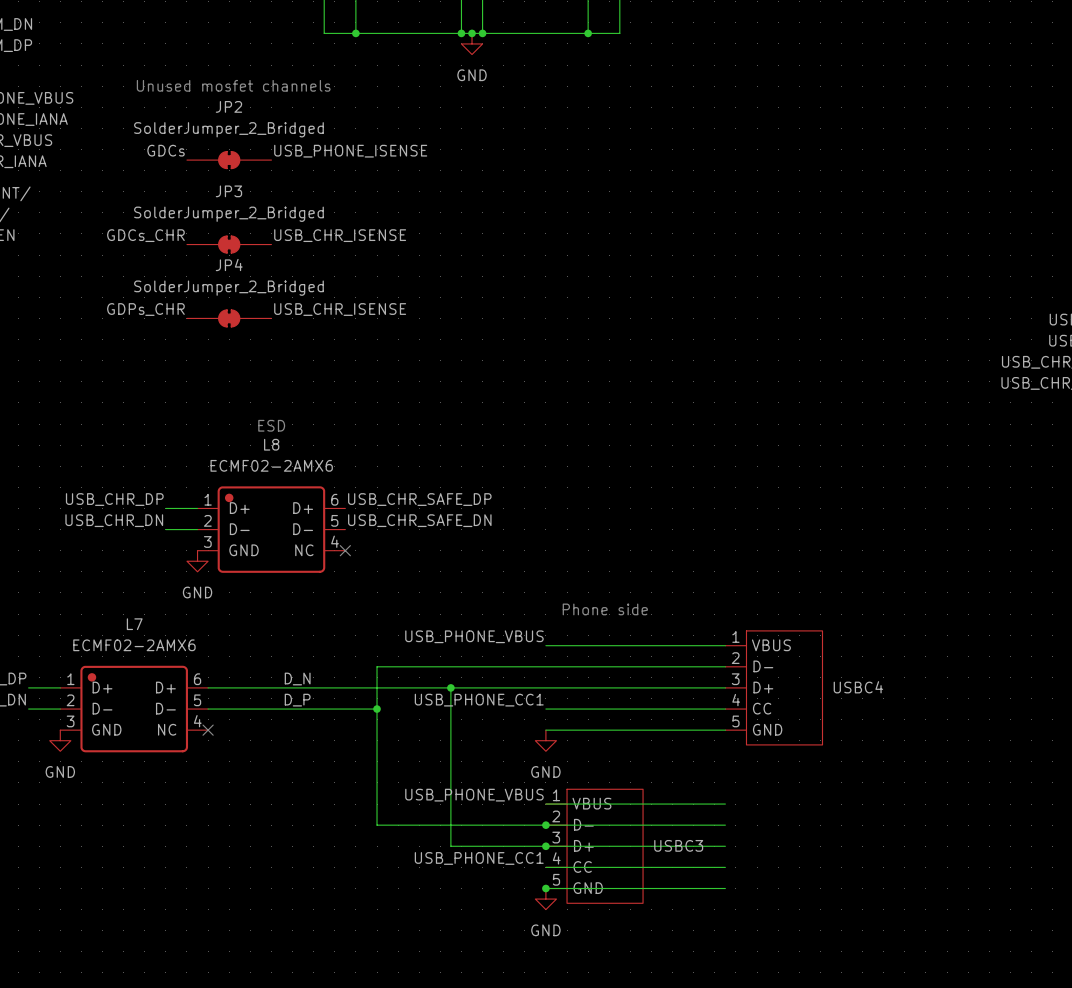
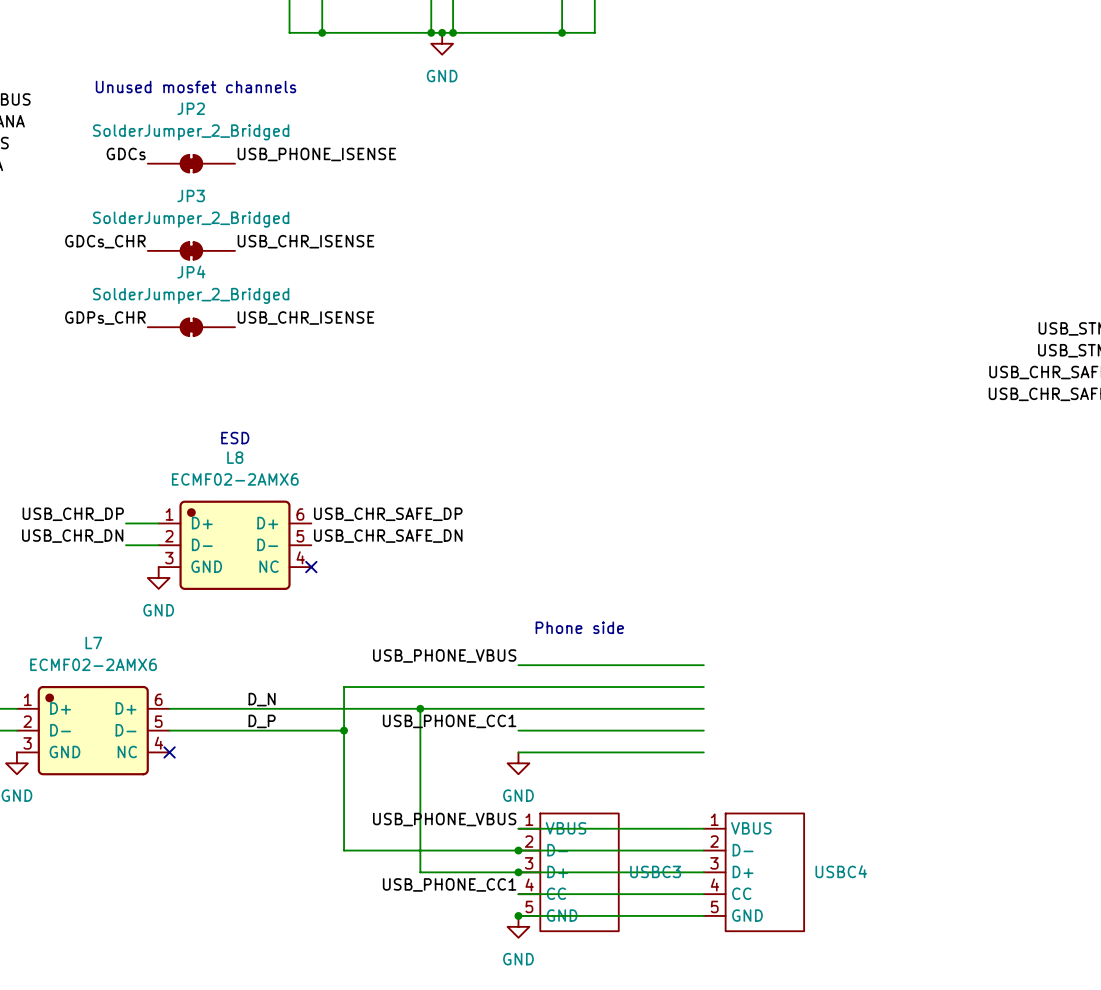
USBC4 position: (773, 687) -> (753, 872)

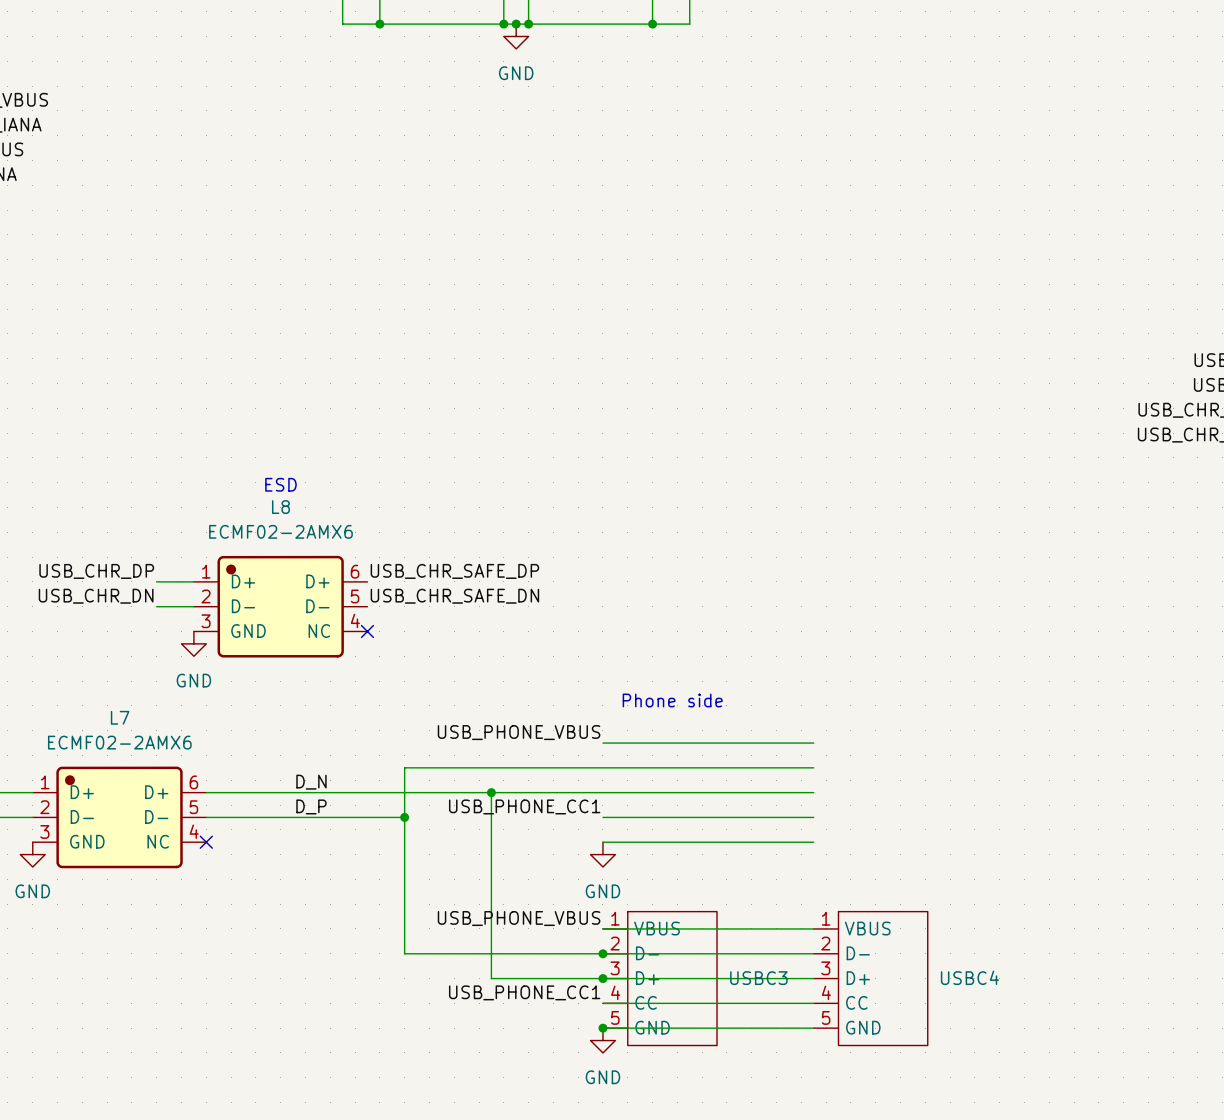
text: Unused mosfet channels (196, 86) -> none
label: GDCs (126, 153) -> none
label: USB_PHONE_ISENSE (316, 154) -> none
JP2: SolderJumper_2_Bridged (191, 163) -> none
label: GDCs_CHR (105, 241) -> none
label: USB_CHR_ISENSE (305, 241) -> none
JP3: SolderJumper_2_Bridged (191, 250) -> none
label: GDPs_CHR (105, 318) -> none
label: USB_CHR_ISENSE (305, 318) -> none
JP4: SolderJumper_2_Bridged (191, 327) -> none

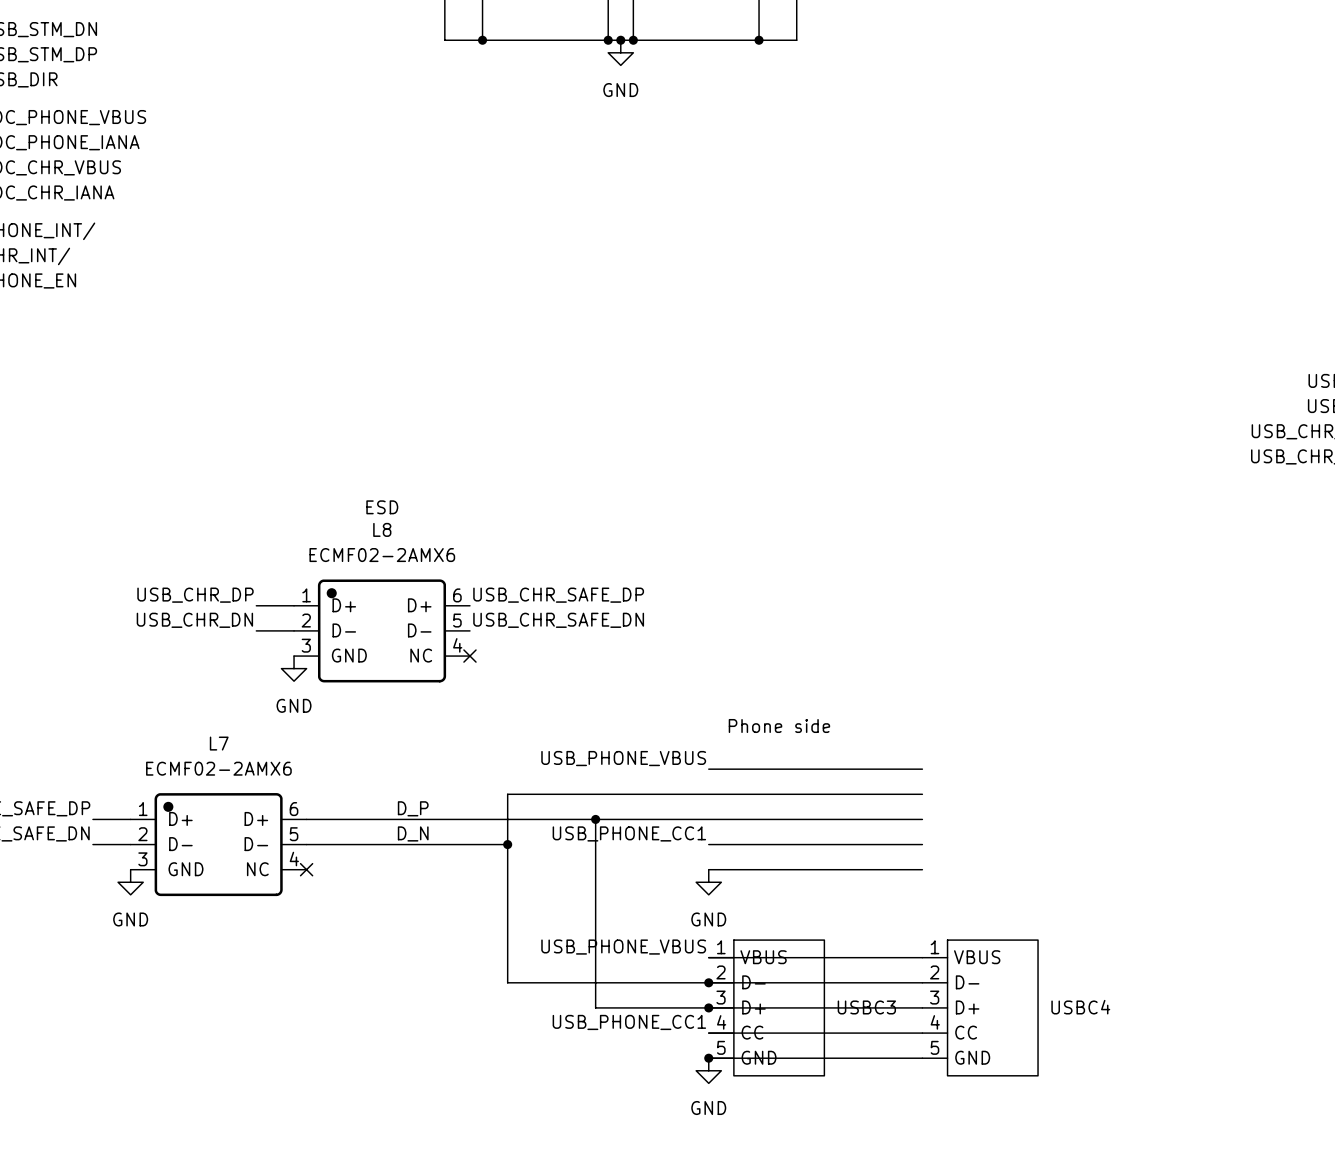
label: D_N (311, 782) -> D_P (413, 808)
label: D_P (311, 806) -> D_N (413, 833)

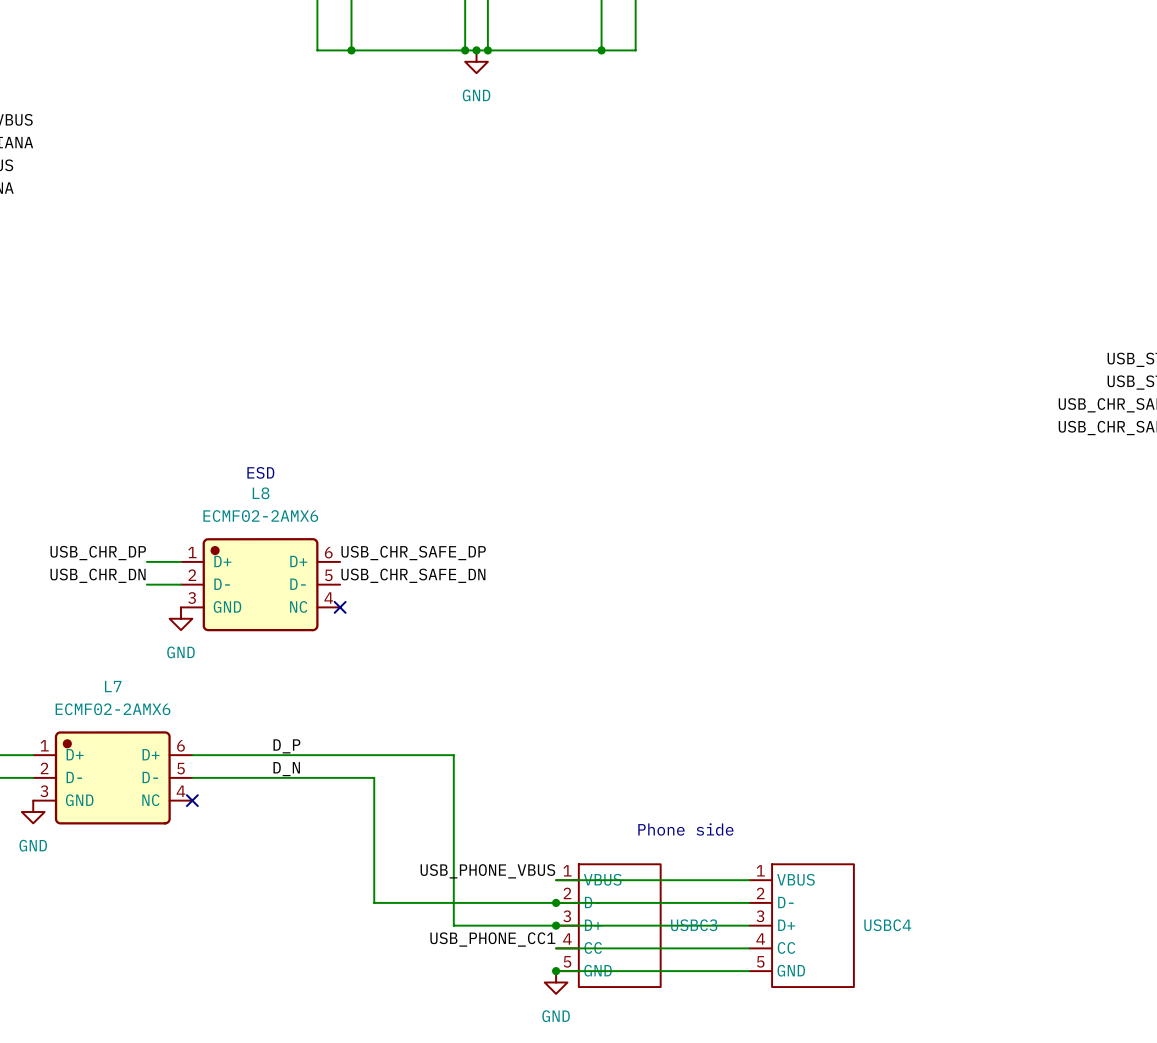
text position: Phone side (779, 726) -> Phone side (685, 829)
label: USB_PHONE_VBUS (623, 758) -> none
wire: (708, 769) (922, 769) -> none
wire: (922, 794) (507, 794) (507, 844) -> none
wire: (595, 819) (922, 819) -> none
junction: (595, 819) -> none
label: USB_PHONE_CC1 (629, 833) -> none
junction: (507, 844) -> none
wire: (708, 844) (922, 844) -> none
wire: (708, 869) (922, 869) -> none
power symbol: GND (708, 882) -> none

